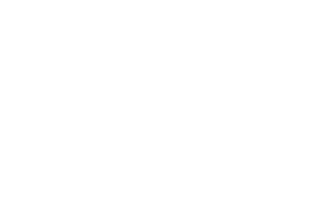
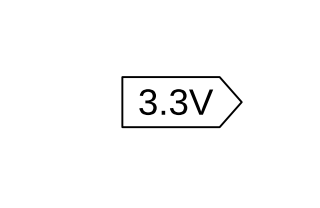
global label: none -> 3.3V (176, 102)

